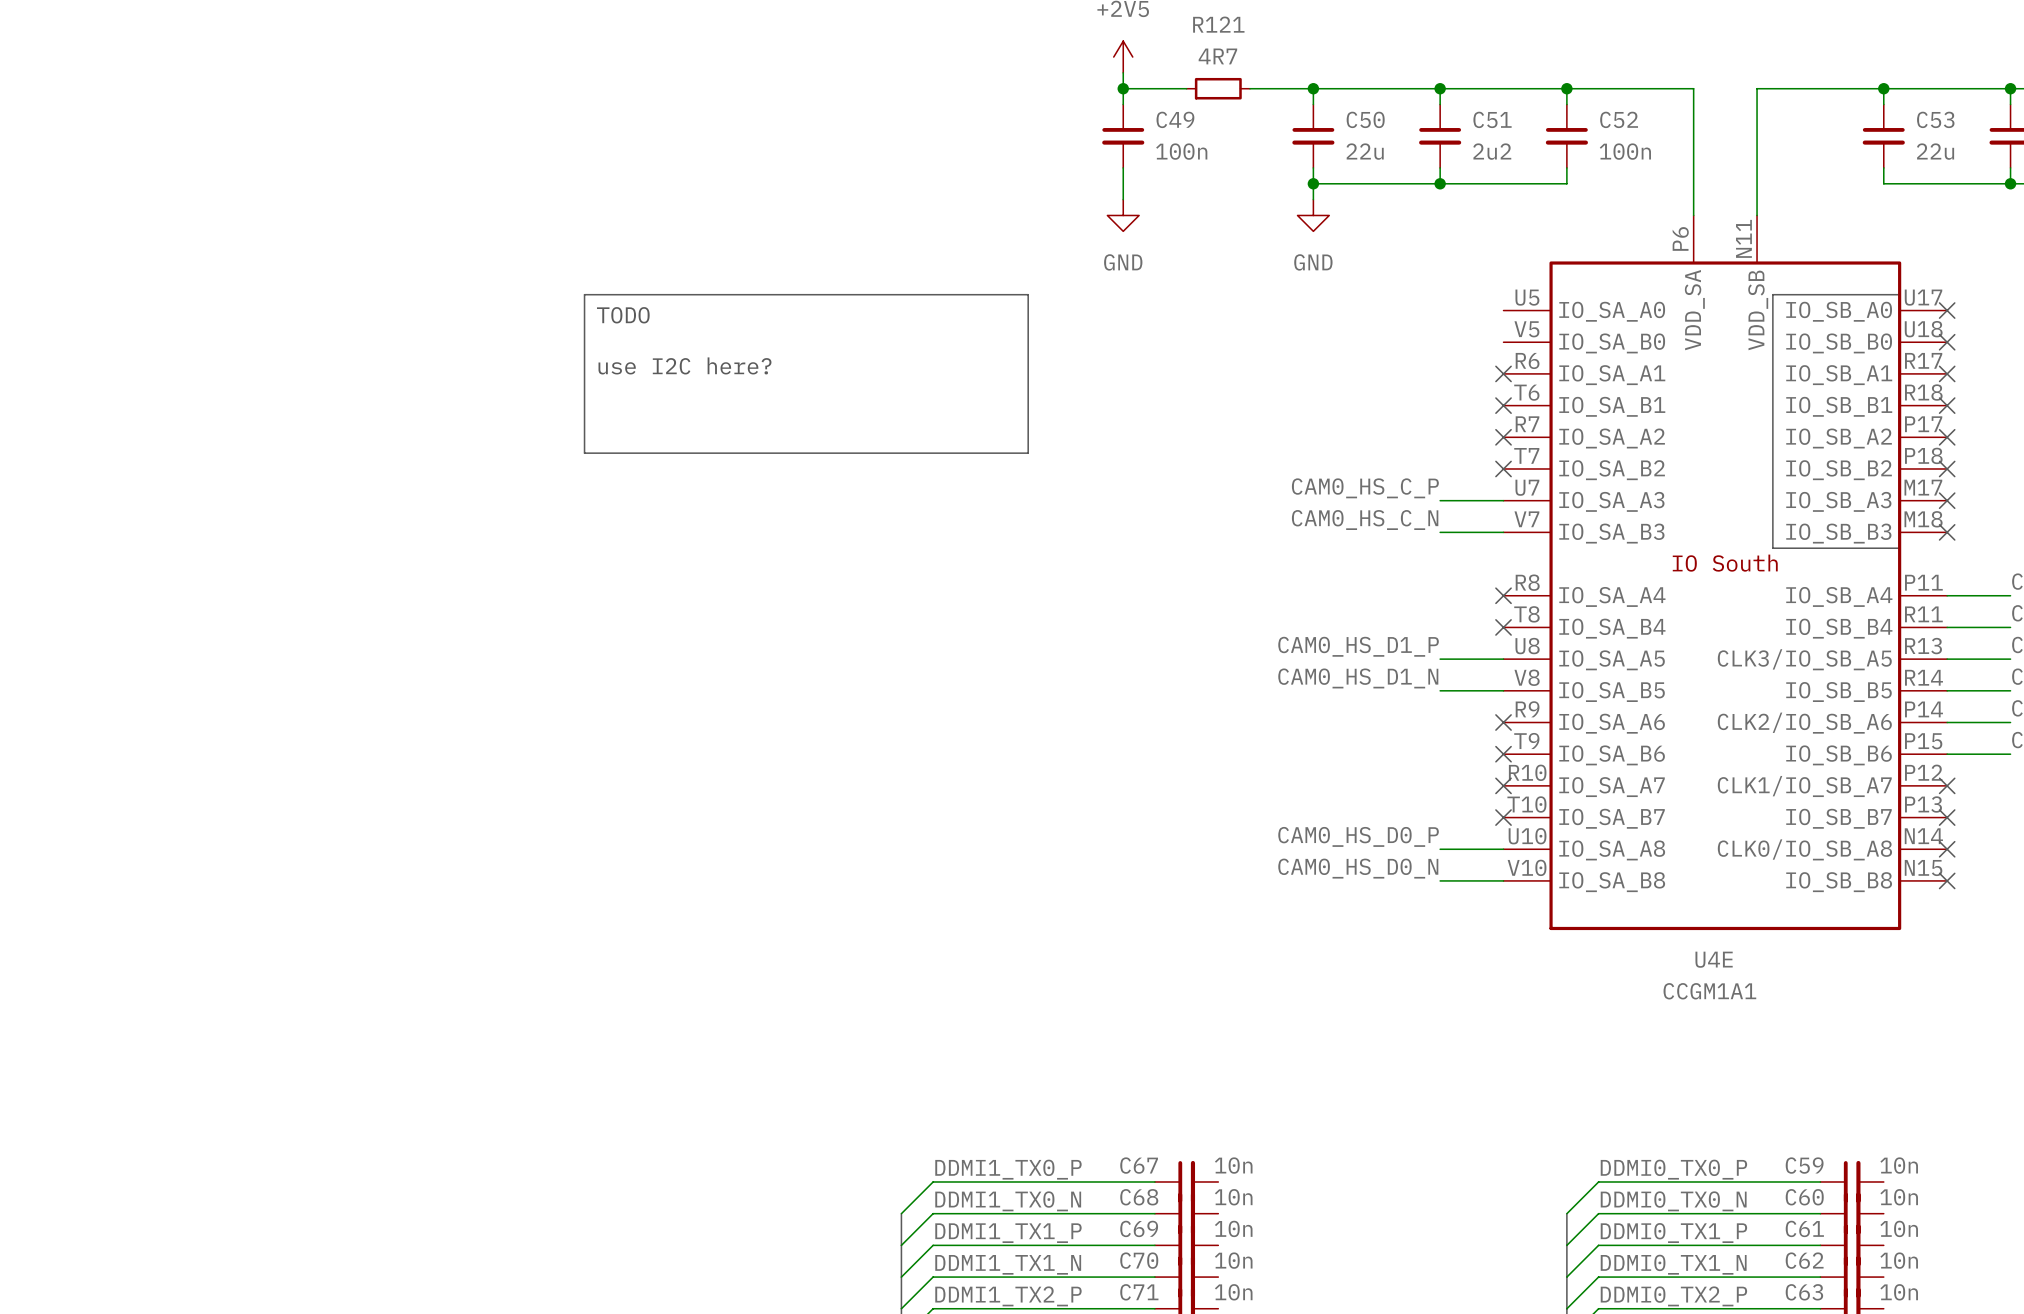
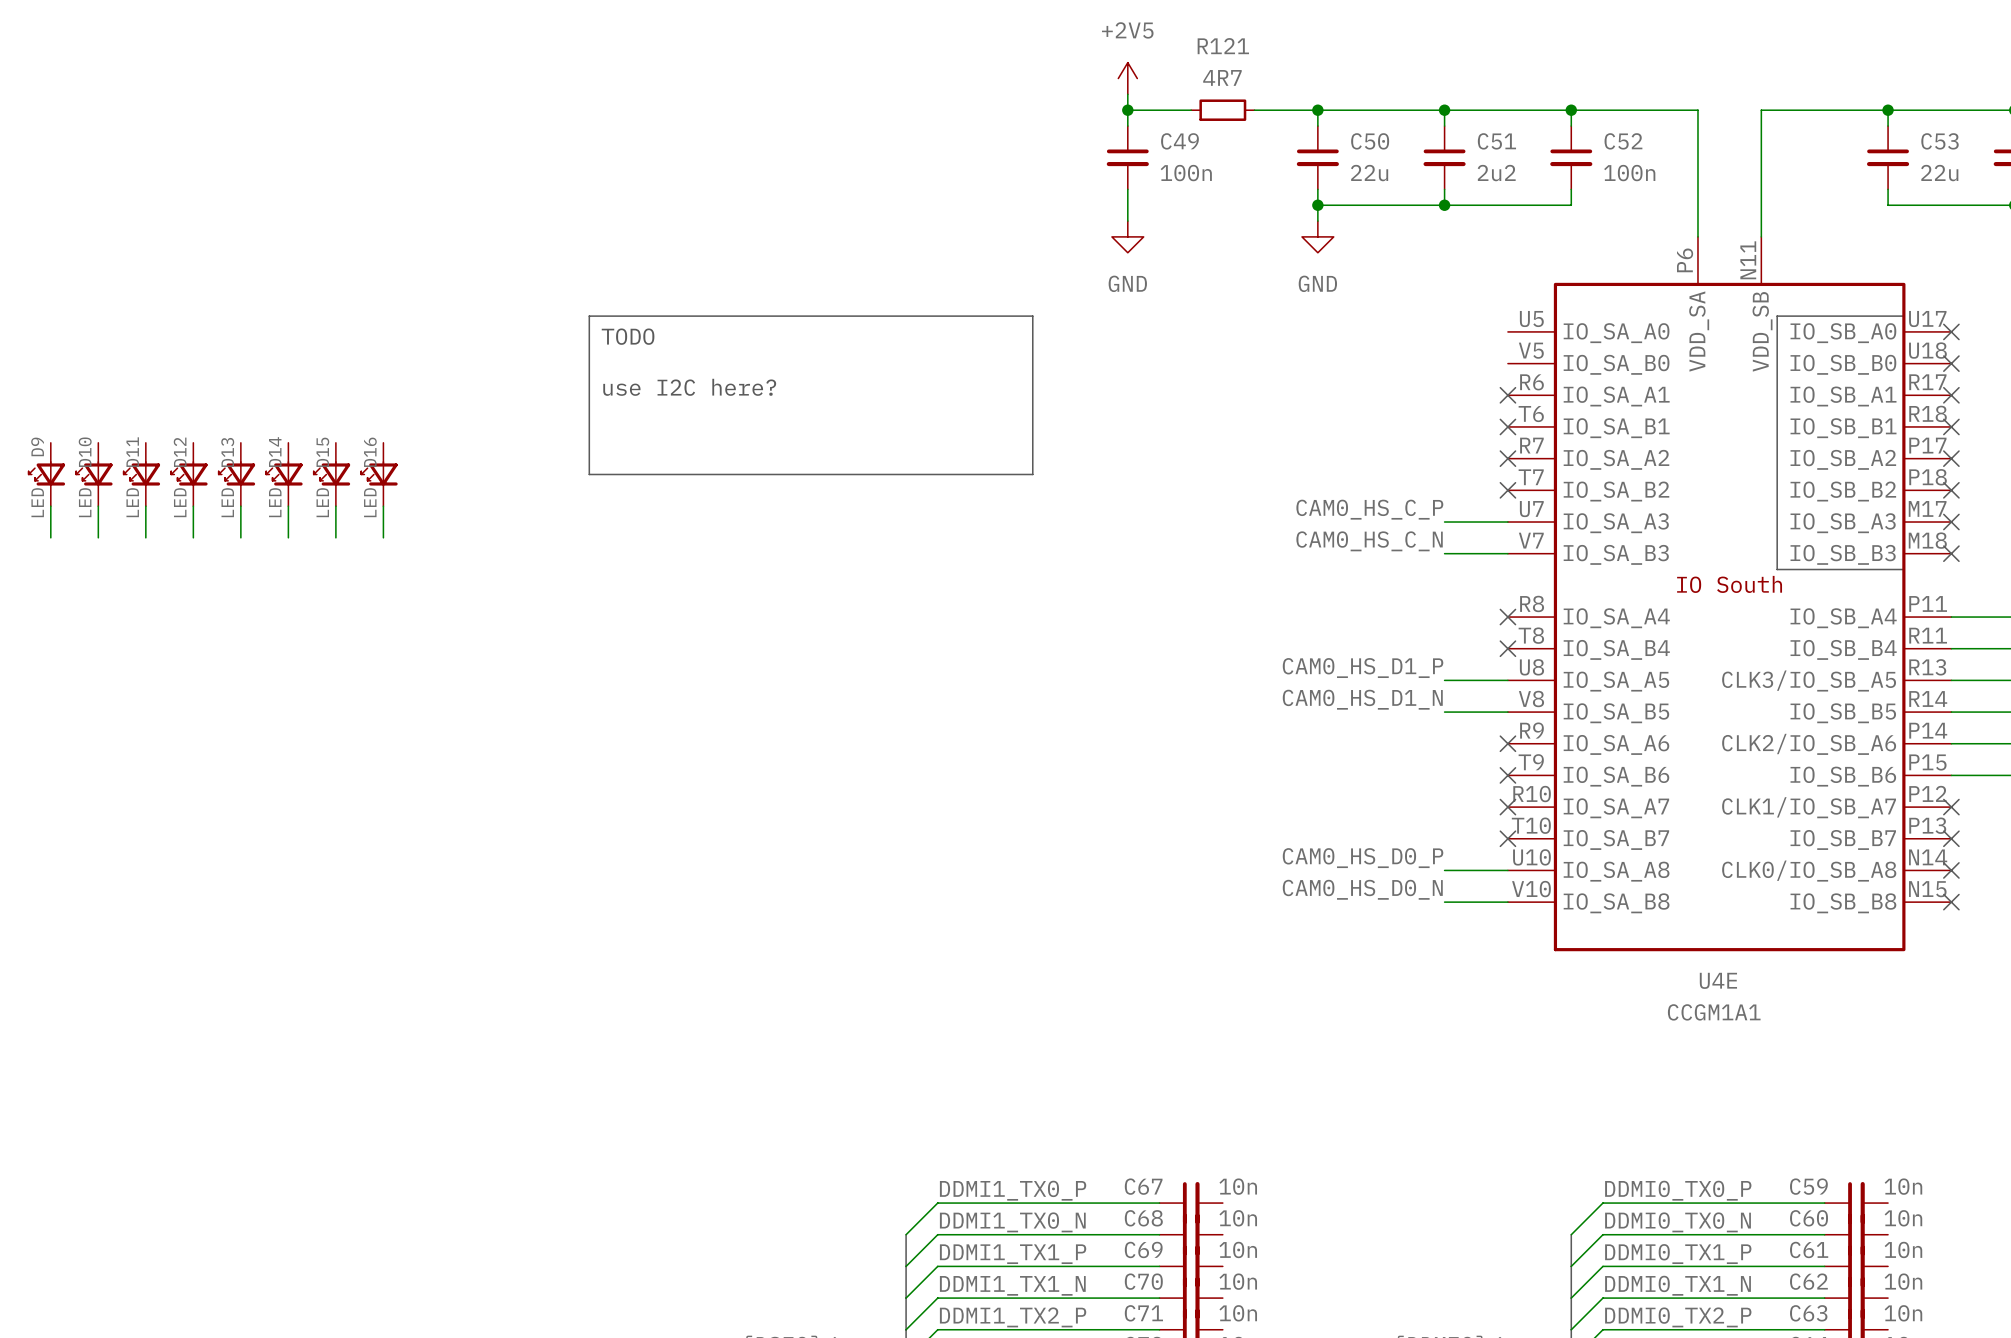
D9: none -> LED (46, 474)
D10: none -> LED (94, 474)
D11: none -> LED (141, 474)
D12: none -> LED (189, 474)
D13: none -> LED (236, 474)
D14: none -> LED (284, 474)
D15: none -> LED (331, 474)
D16: none -> LED (379, 474)
wire: none -> (50, 506) (50, 537)
wire: none -> (98, 506) (98, 537)
wire: none -> (145, 506) (145, 537)
wire: none -> (193, 506) (193, 537)
wire: none -> (240, 506) (240, 537)
wire: none -> (288, 506) (288, 537)
wire: none -> (335, 506) (335, 537)
wire: none -> (383, 506) (383, 537)

